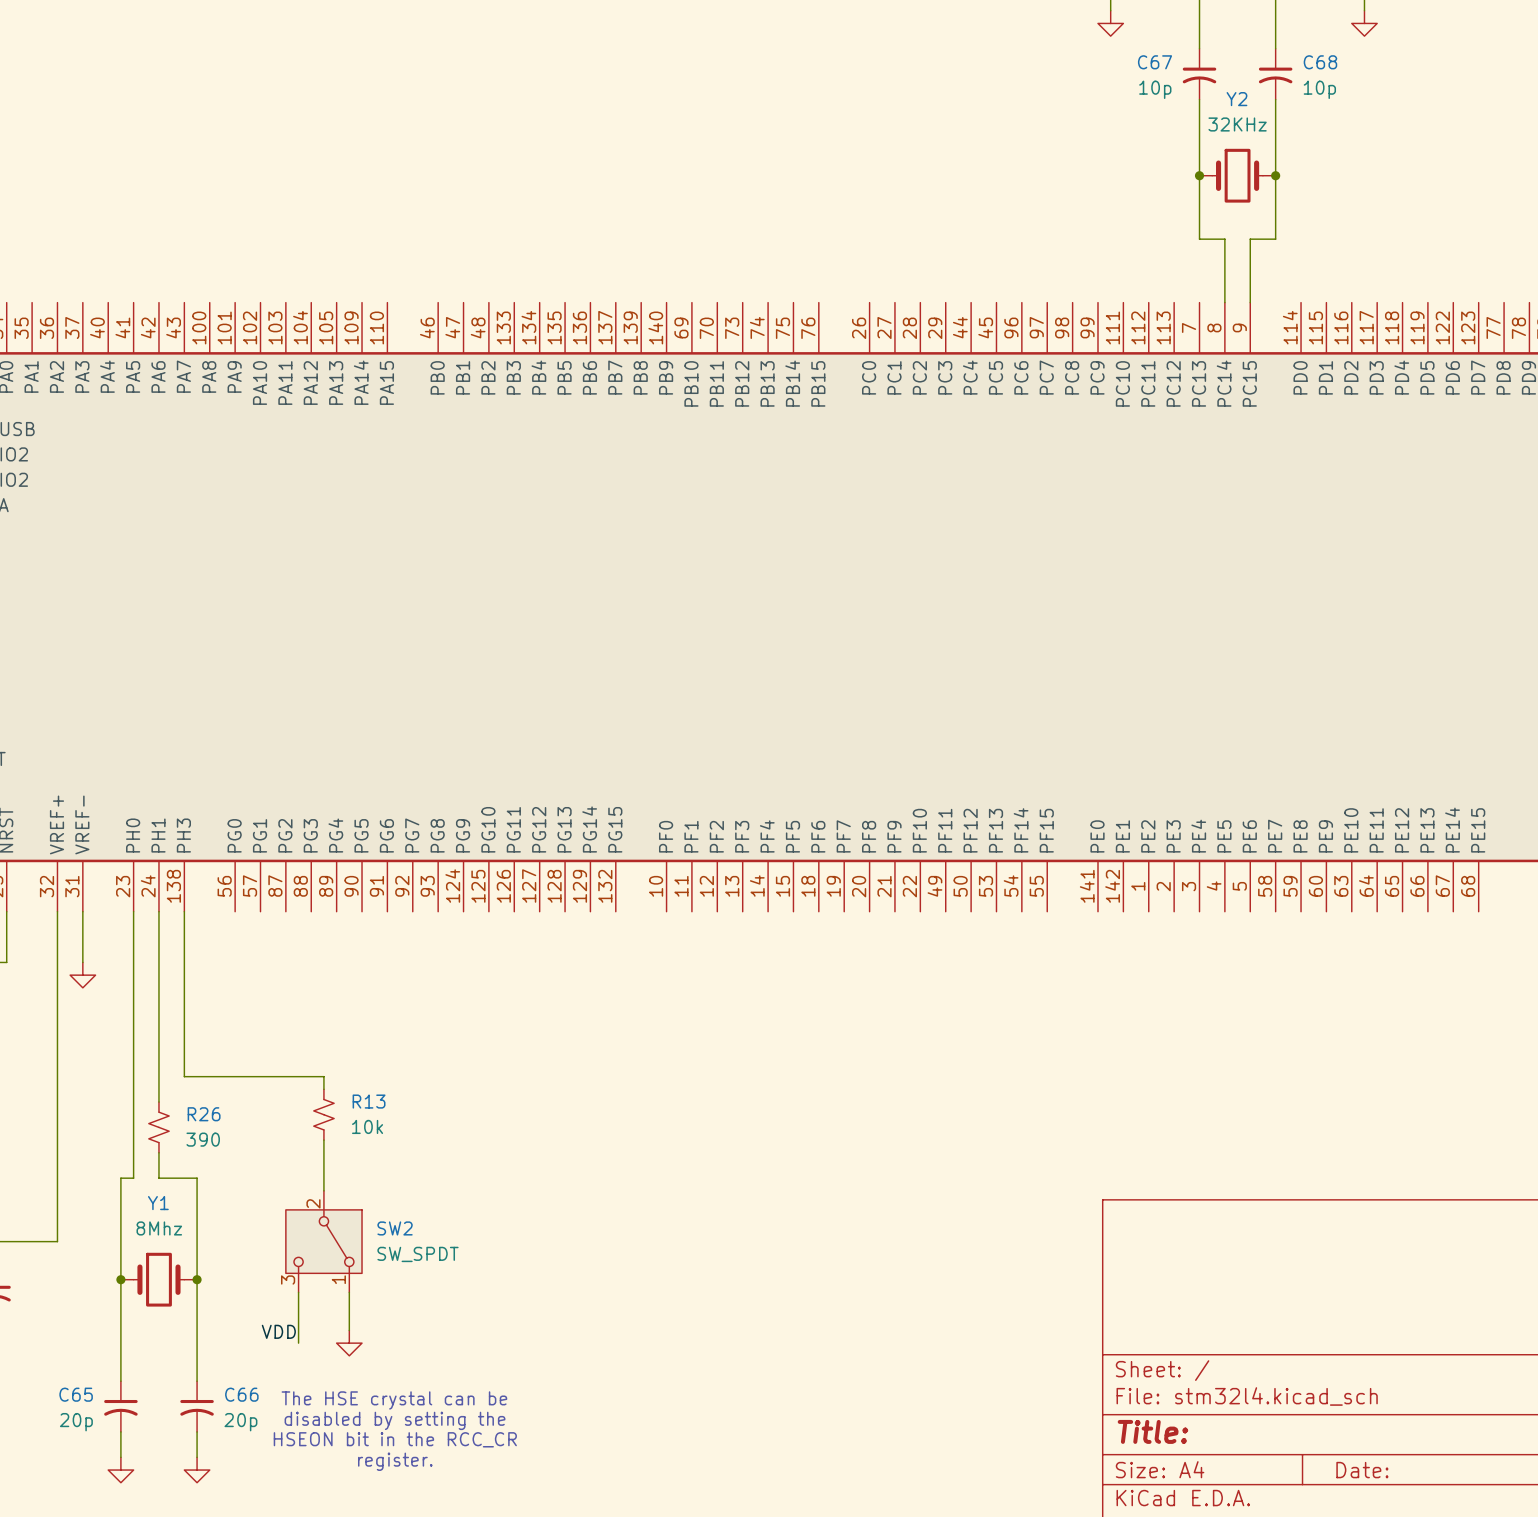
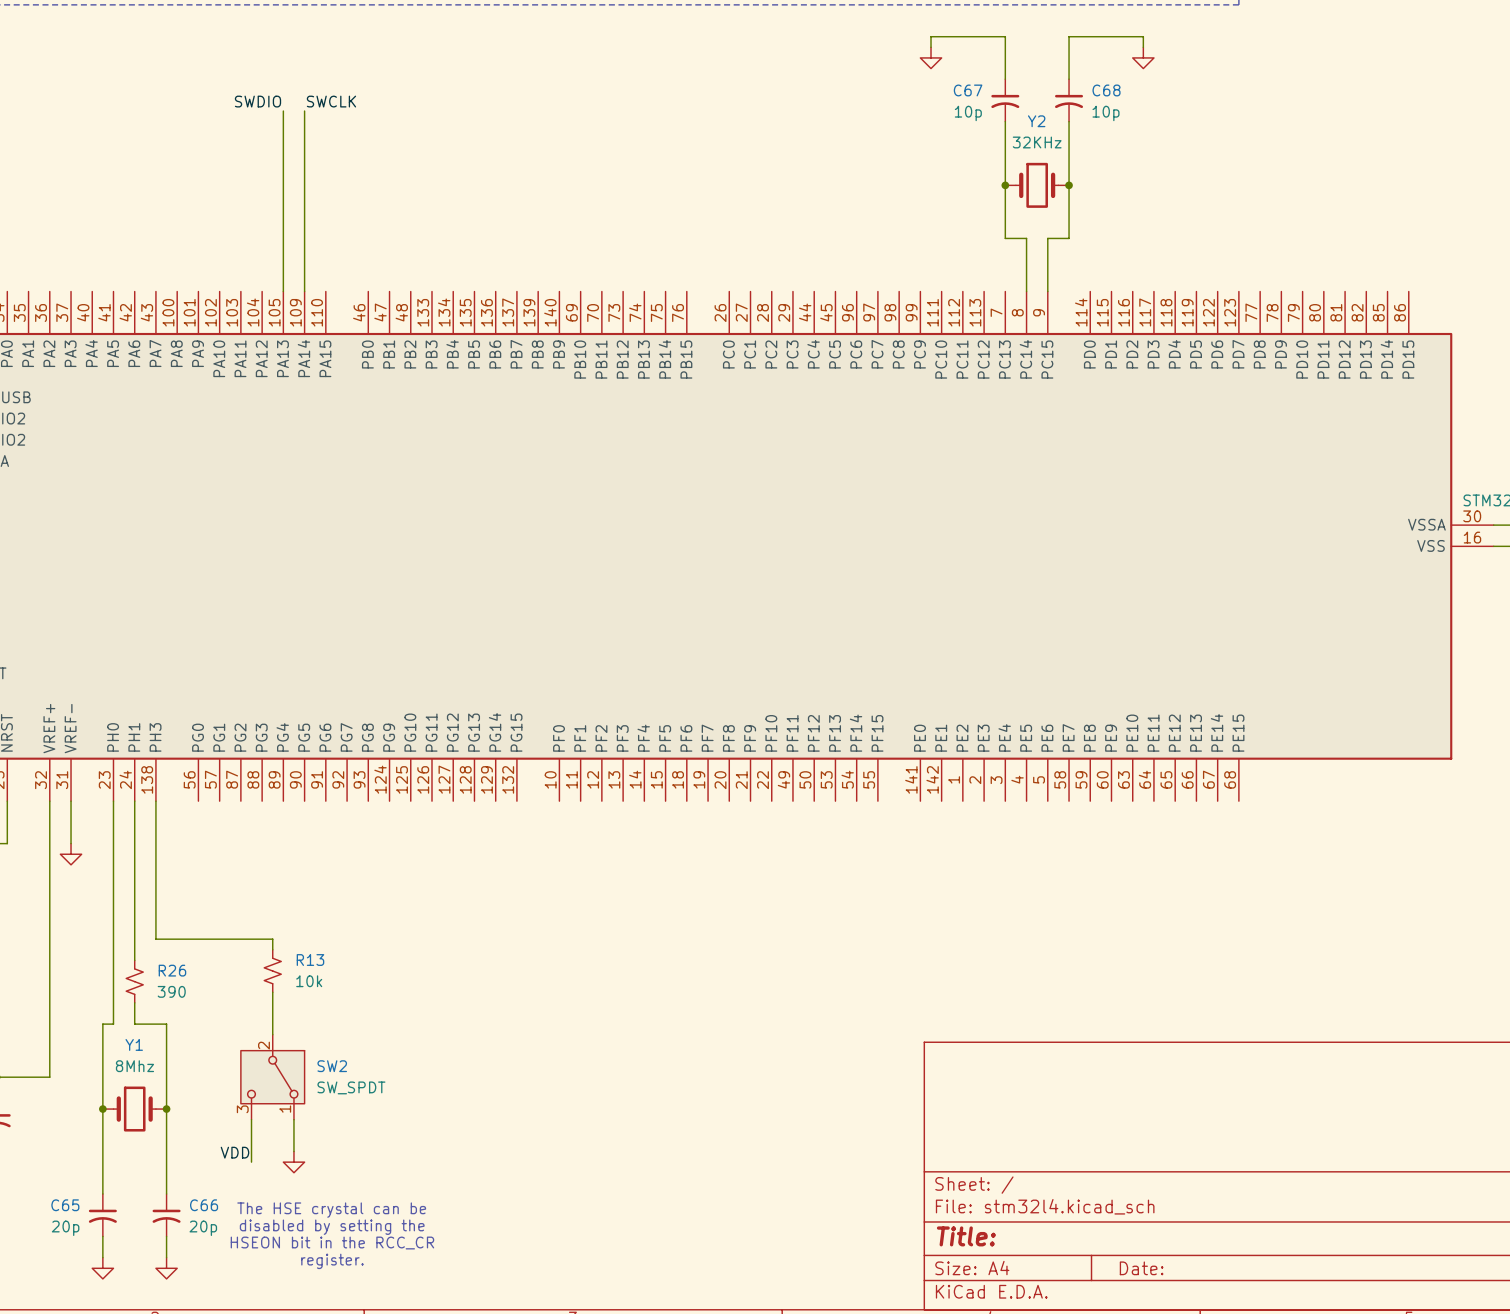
label: none -> SWDIO (258, 101)
label: none -> SWCLK (331, 101)
wire: none -> (283, 111) (283, 291)
wire: none -> (304, 111) (304, 291)

